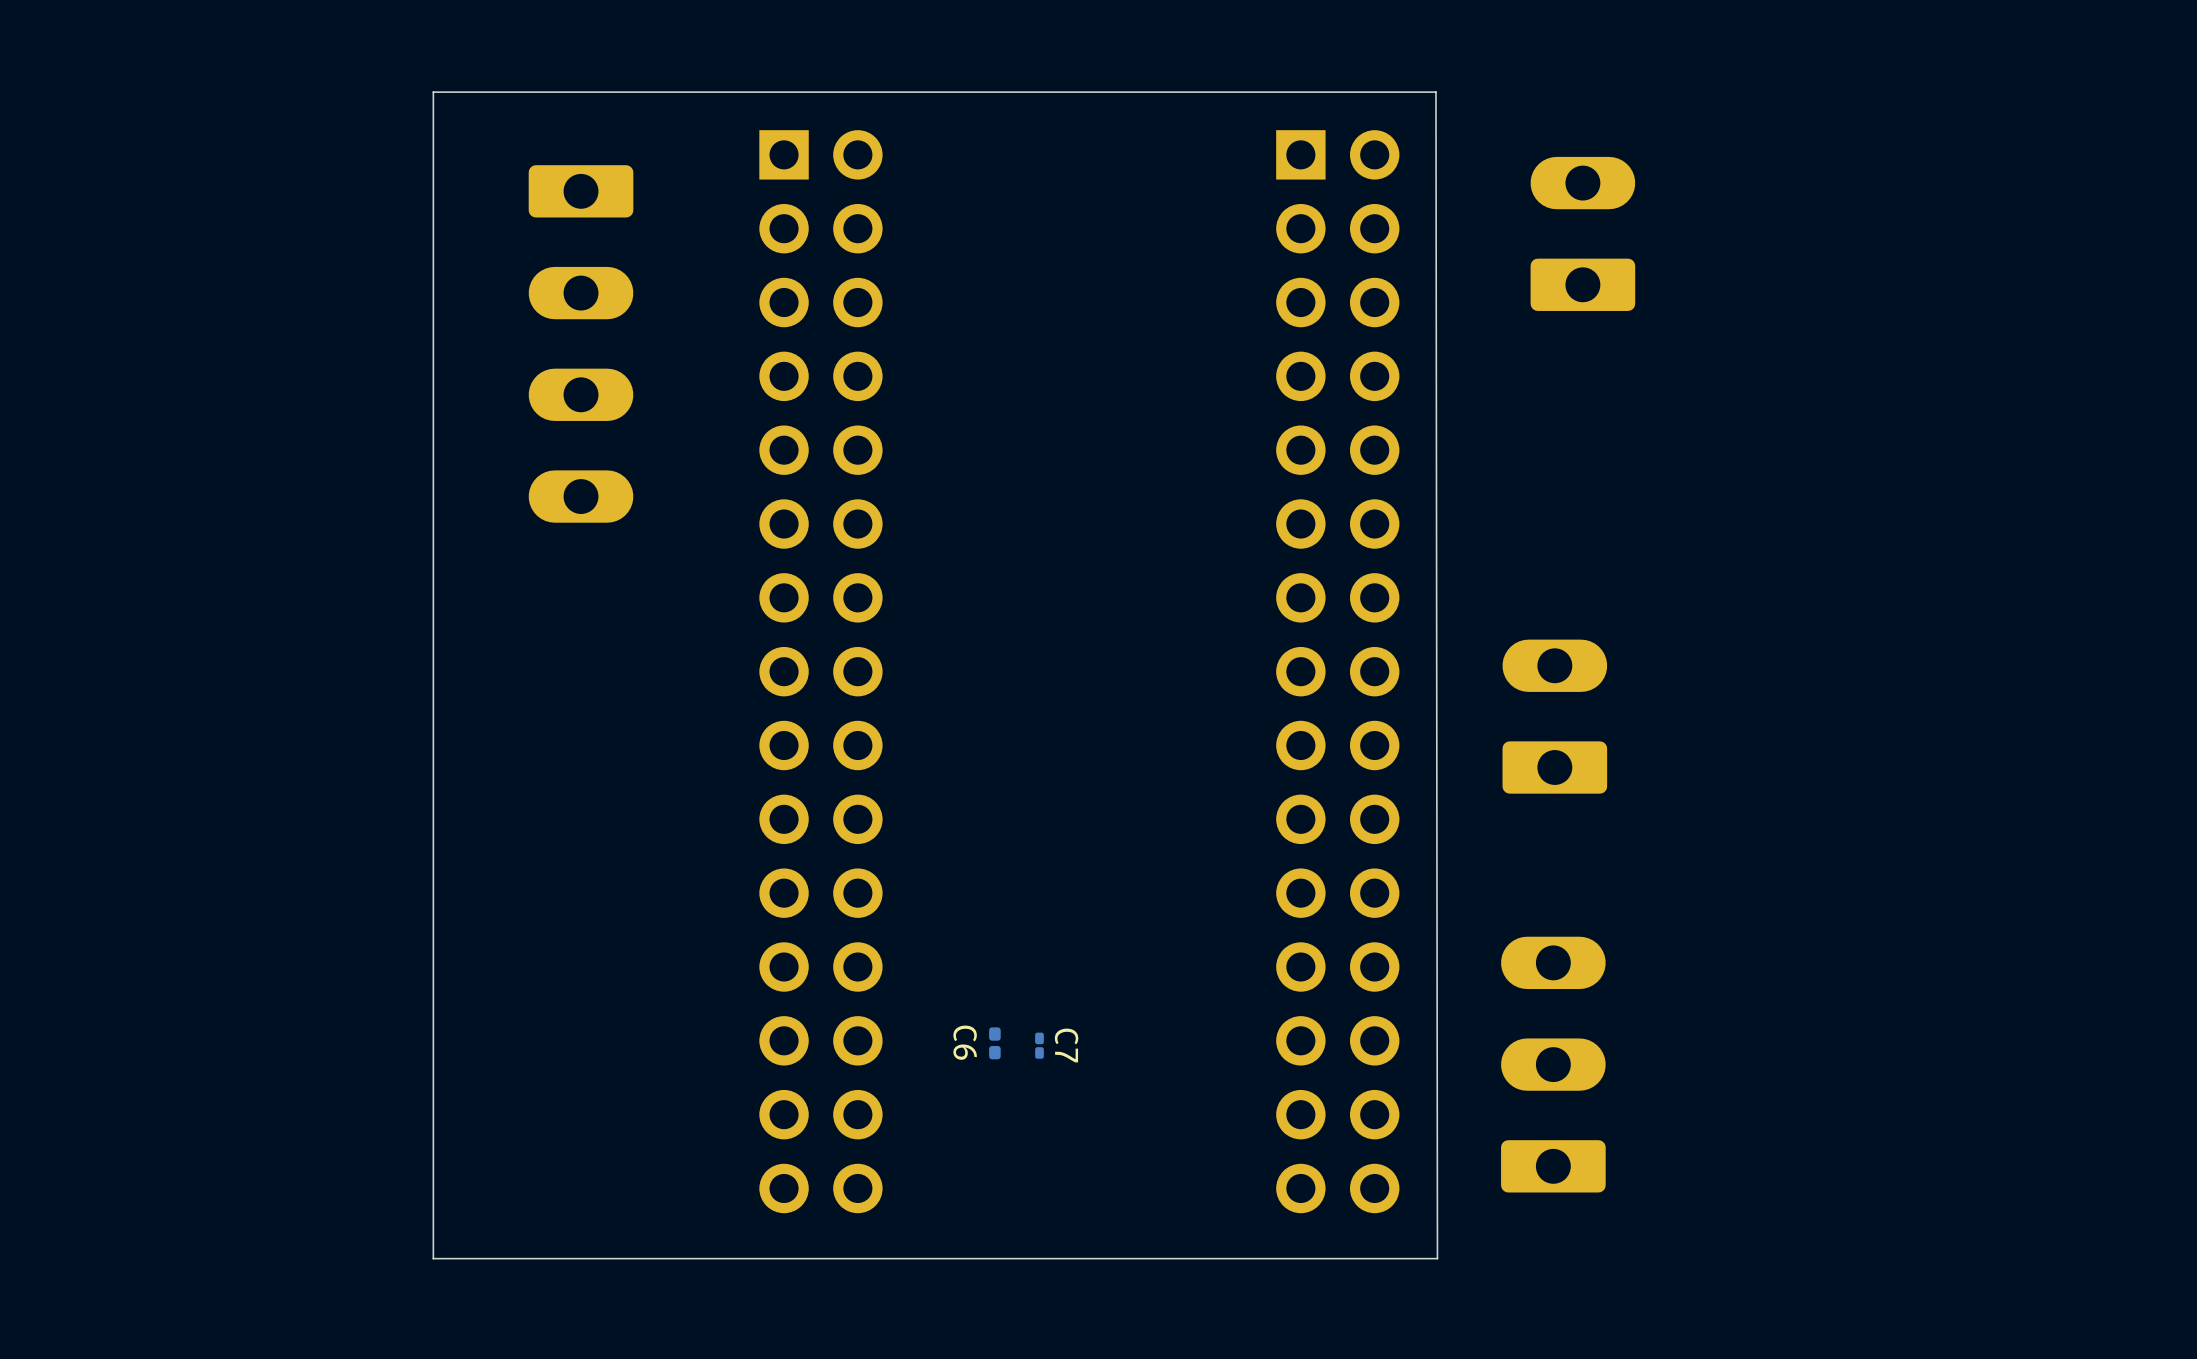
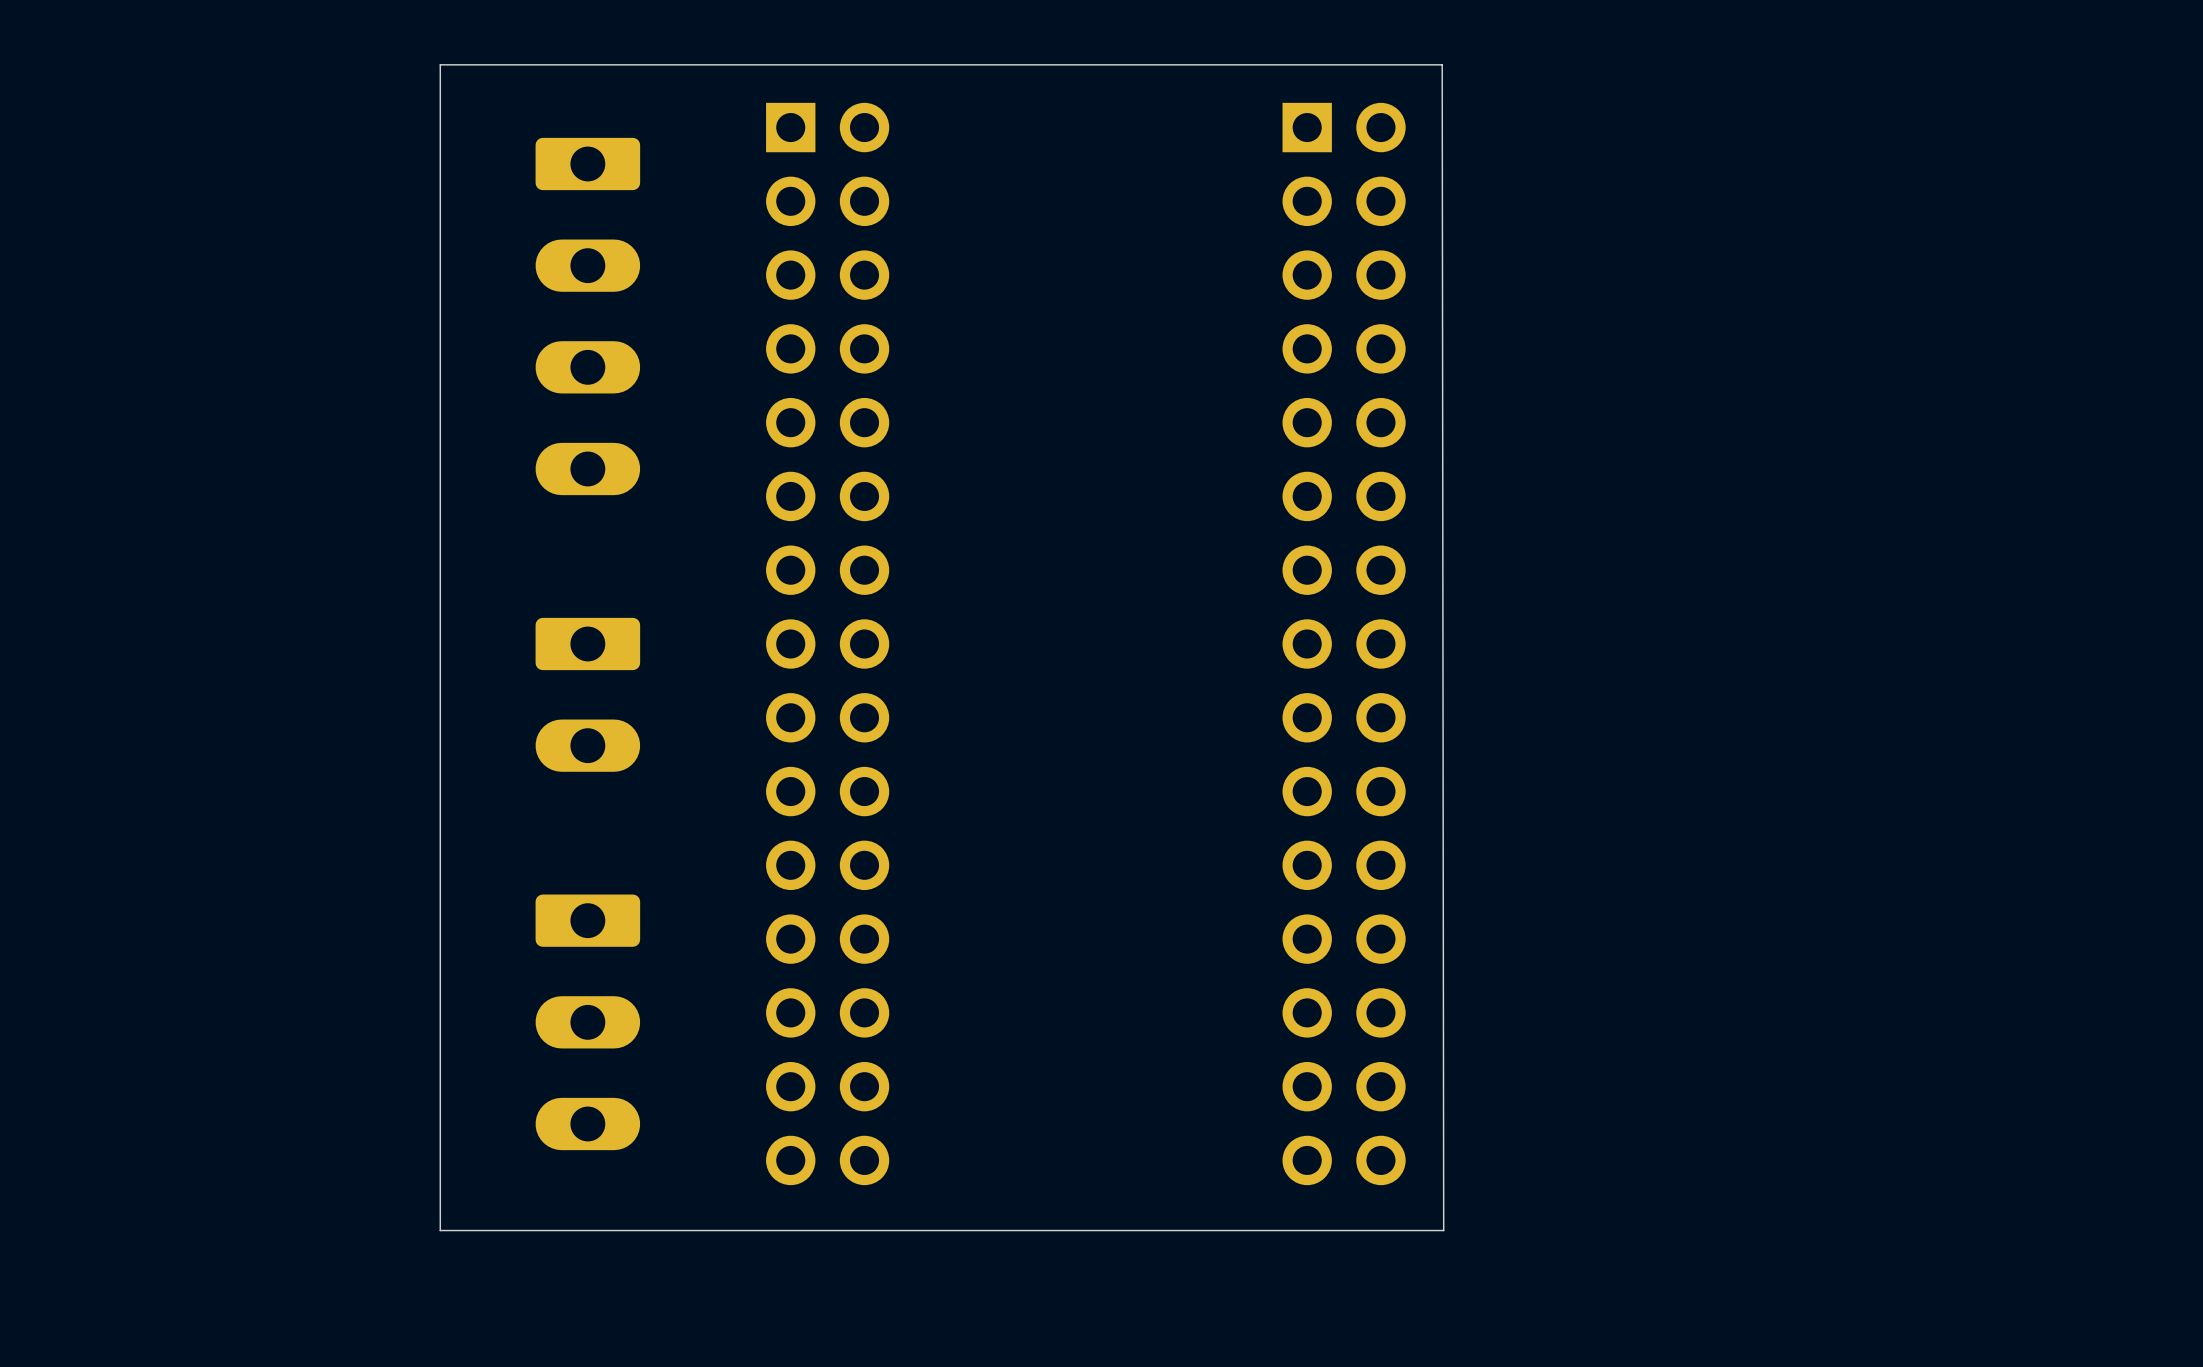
part: (1582, 233) -> none
part: (1554, 716) -> none
part: none -> (587, 694)
C6: (994, 1043) -> none
C7: (1039, 1045) -> none
part: none -> (587, 1022)
part: (1553, 1064) -> none

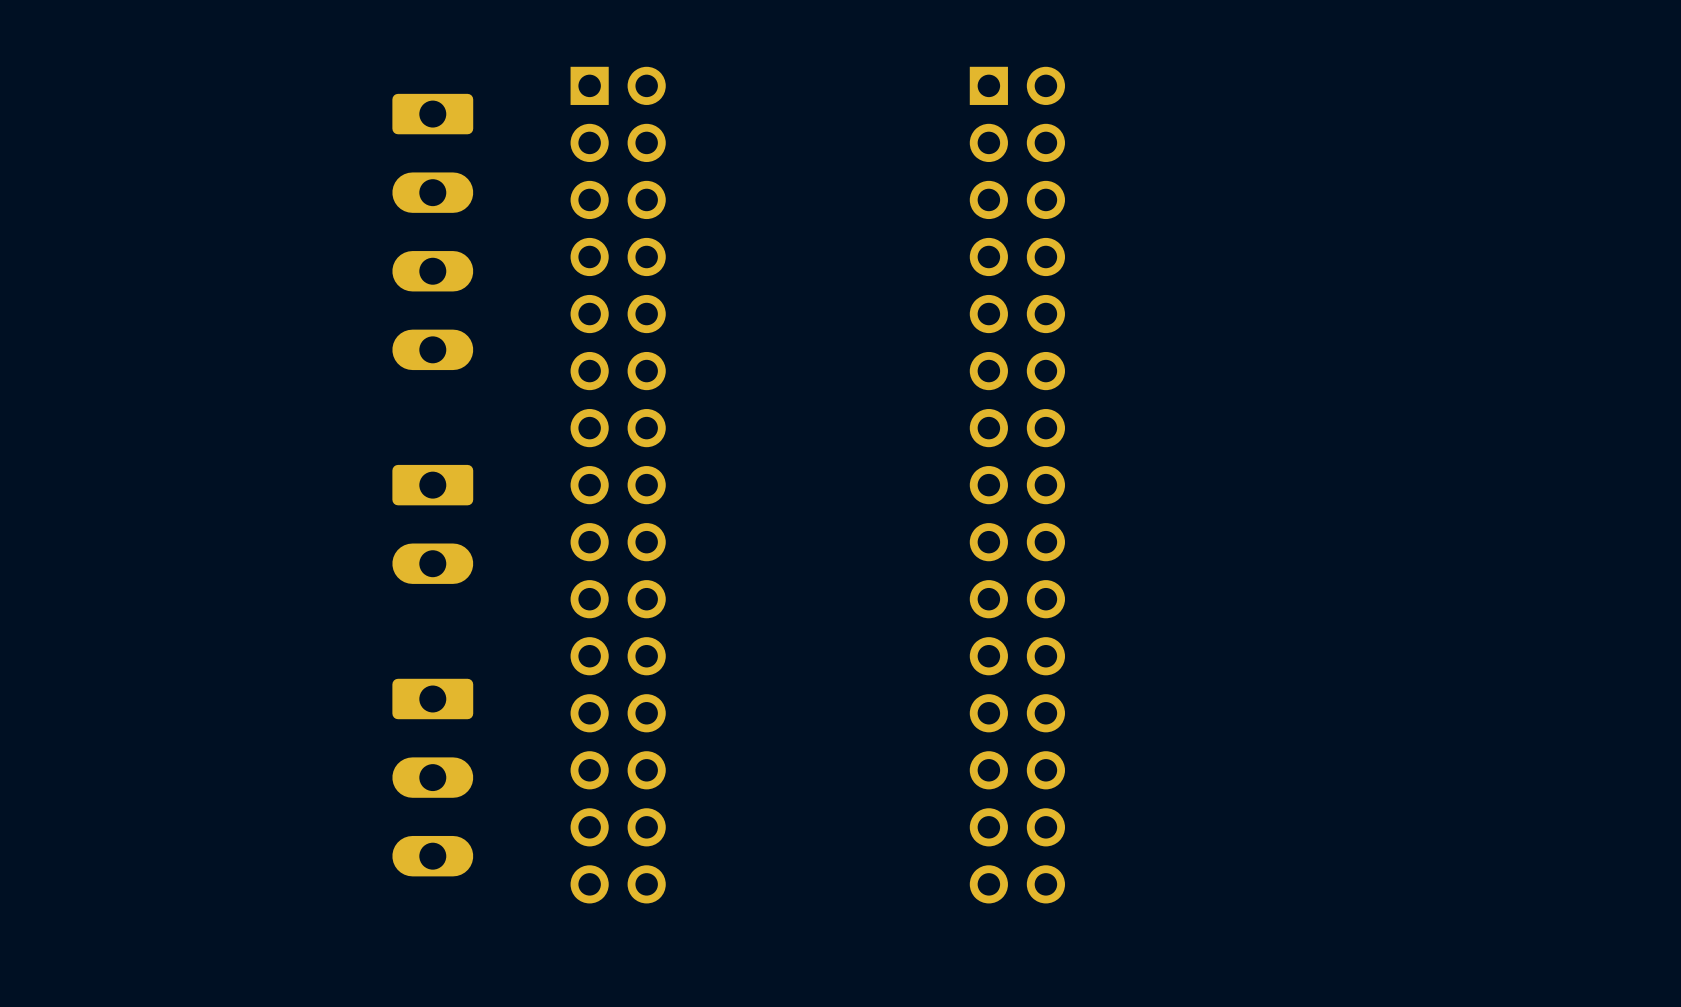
board edge: (1442, 64) (440, 64) (440, 1230) (1443, 1230) (1442, 64) -> none

